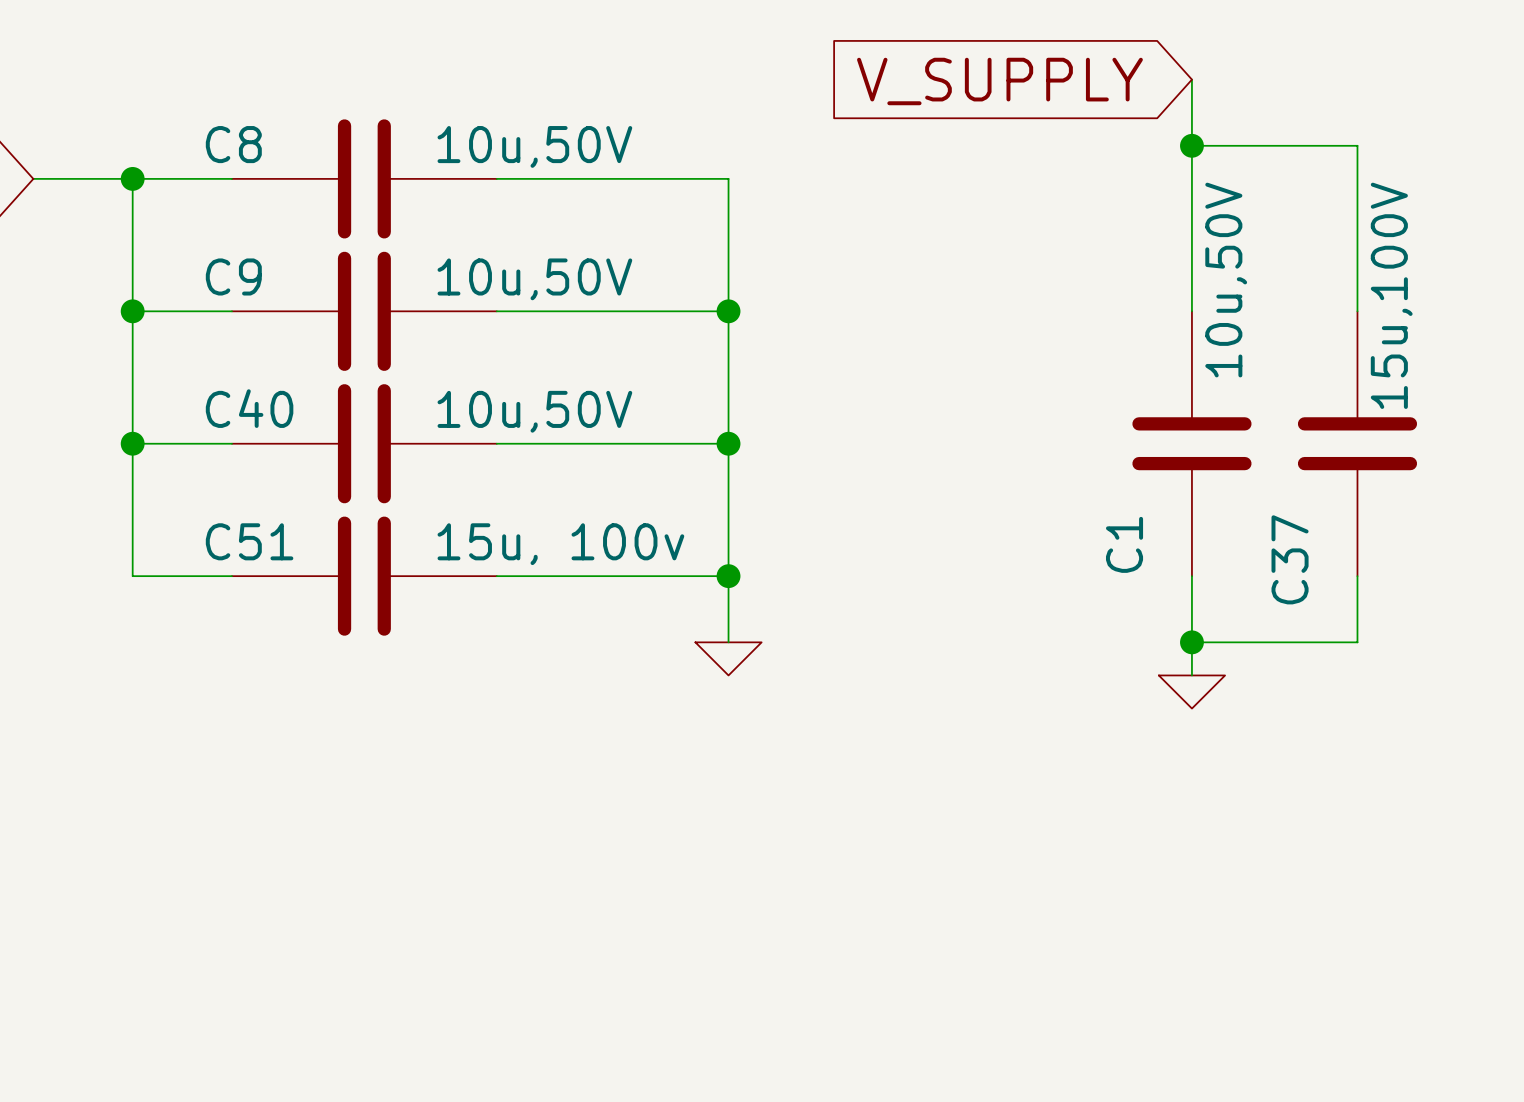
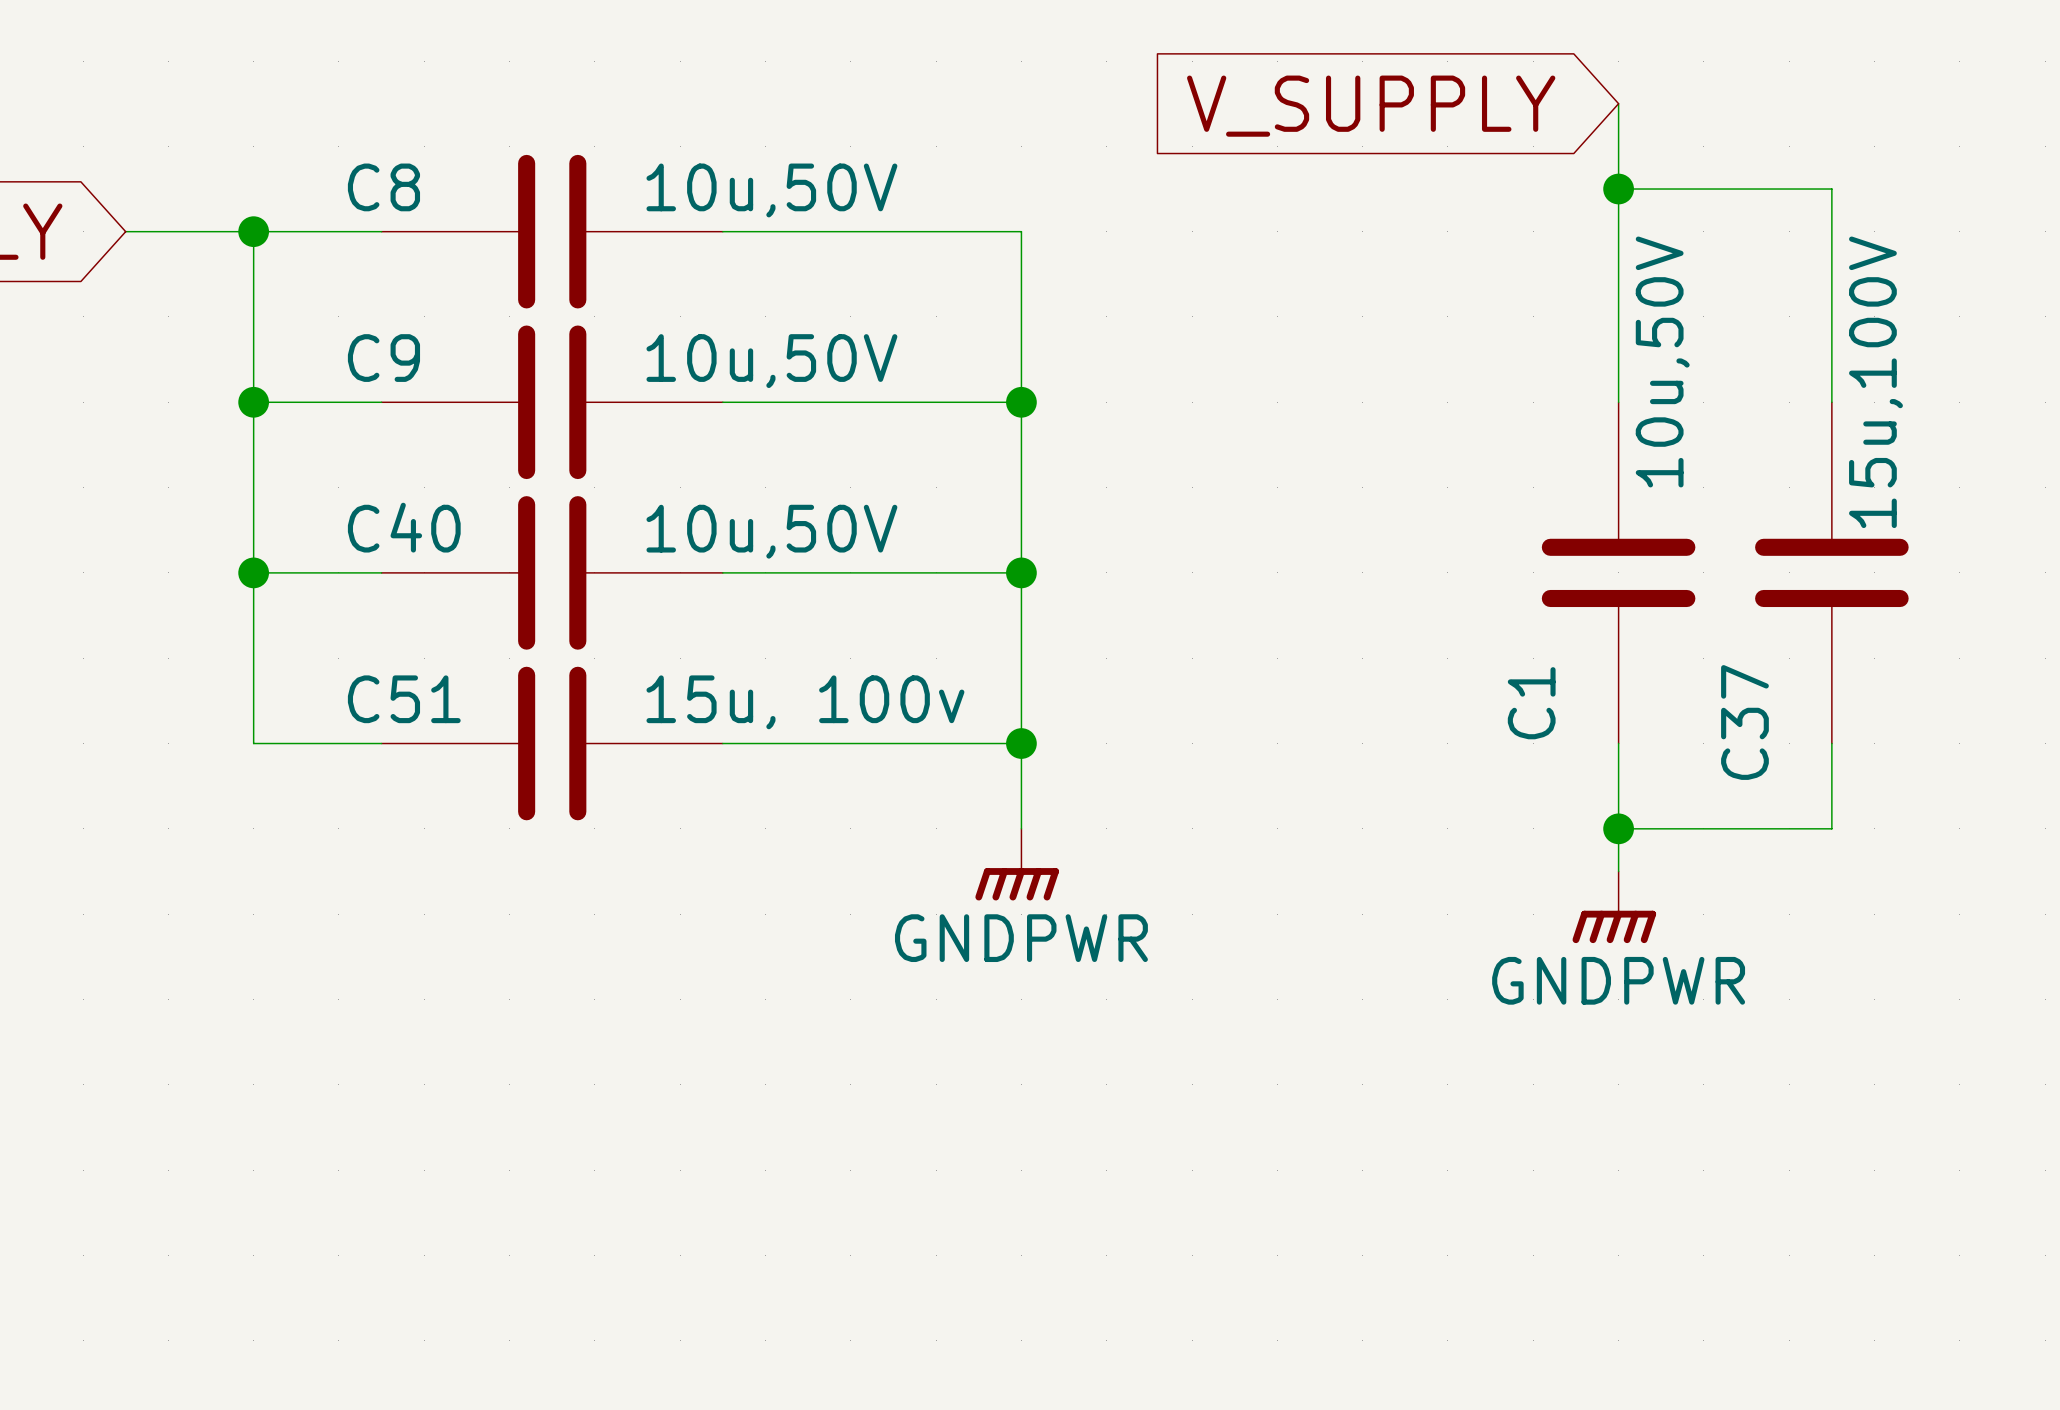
power symbol shape: [695, 642, 762, 676] -> [975, 828, 1059, 901]
power symbol shape: [1158, 675, 1226, 709] -> [1572, 871, 1657, 944]
power symbol text: none -> GNDPWR (1021, 938)
power symbol text: none -> GNDPWR (1618, 980)

